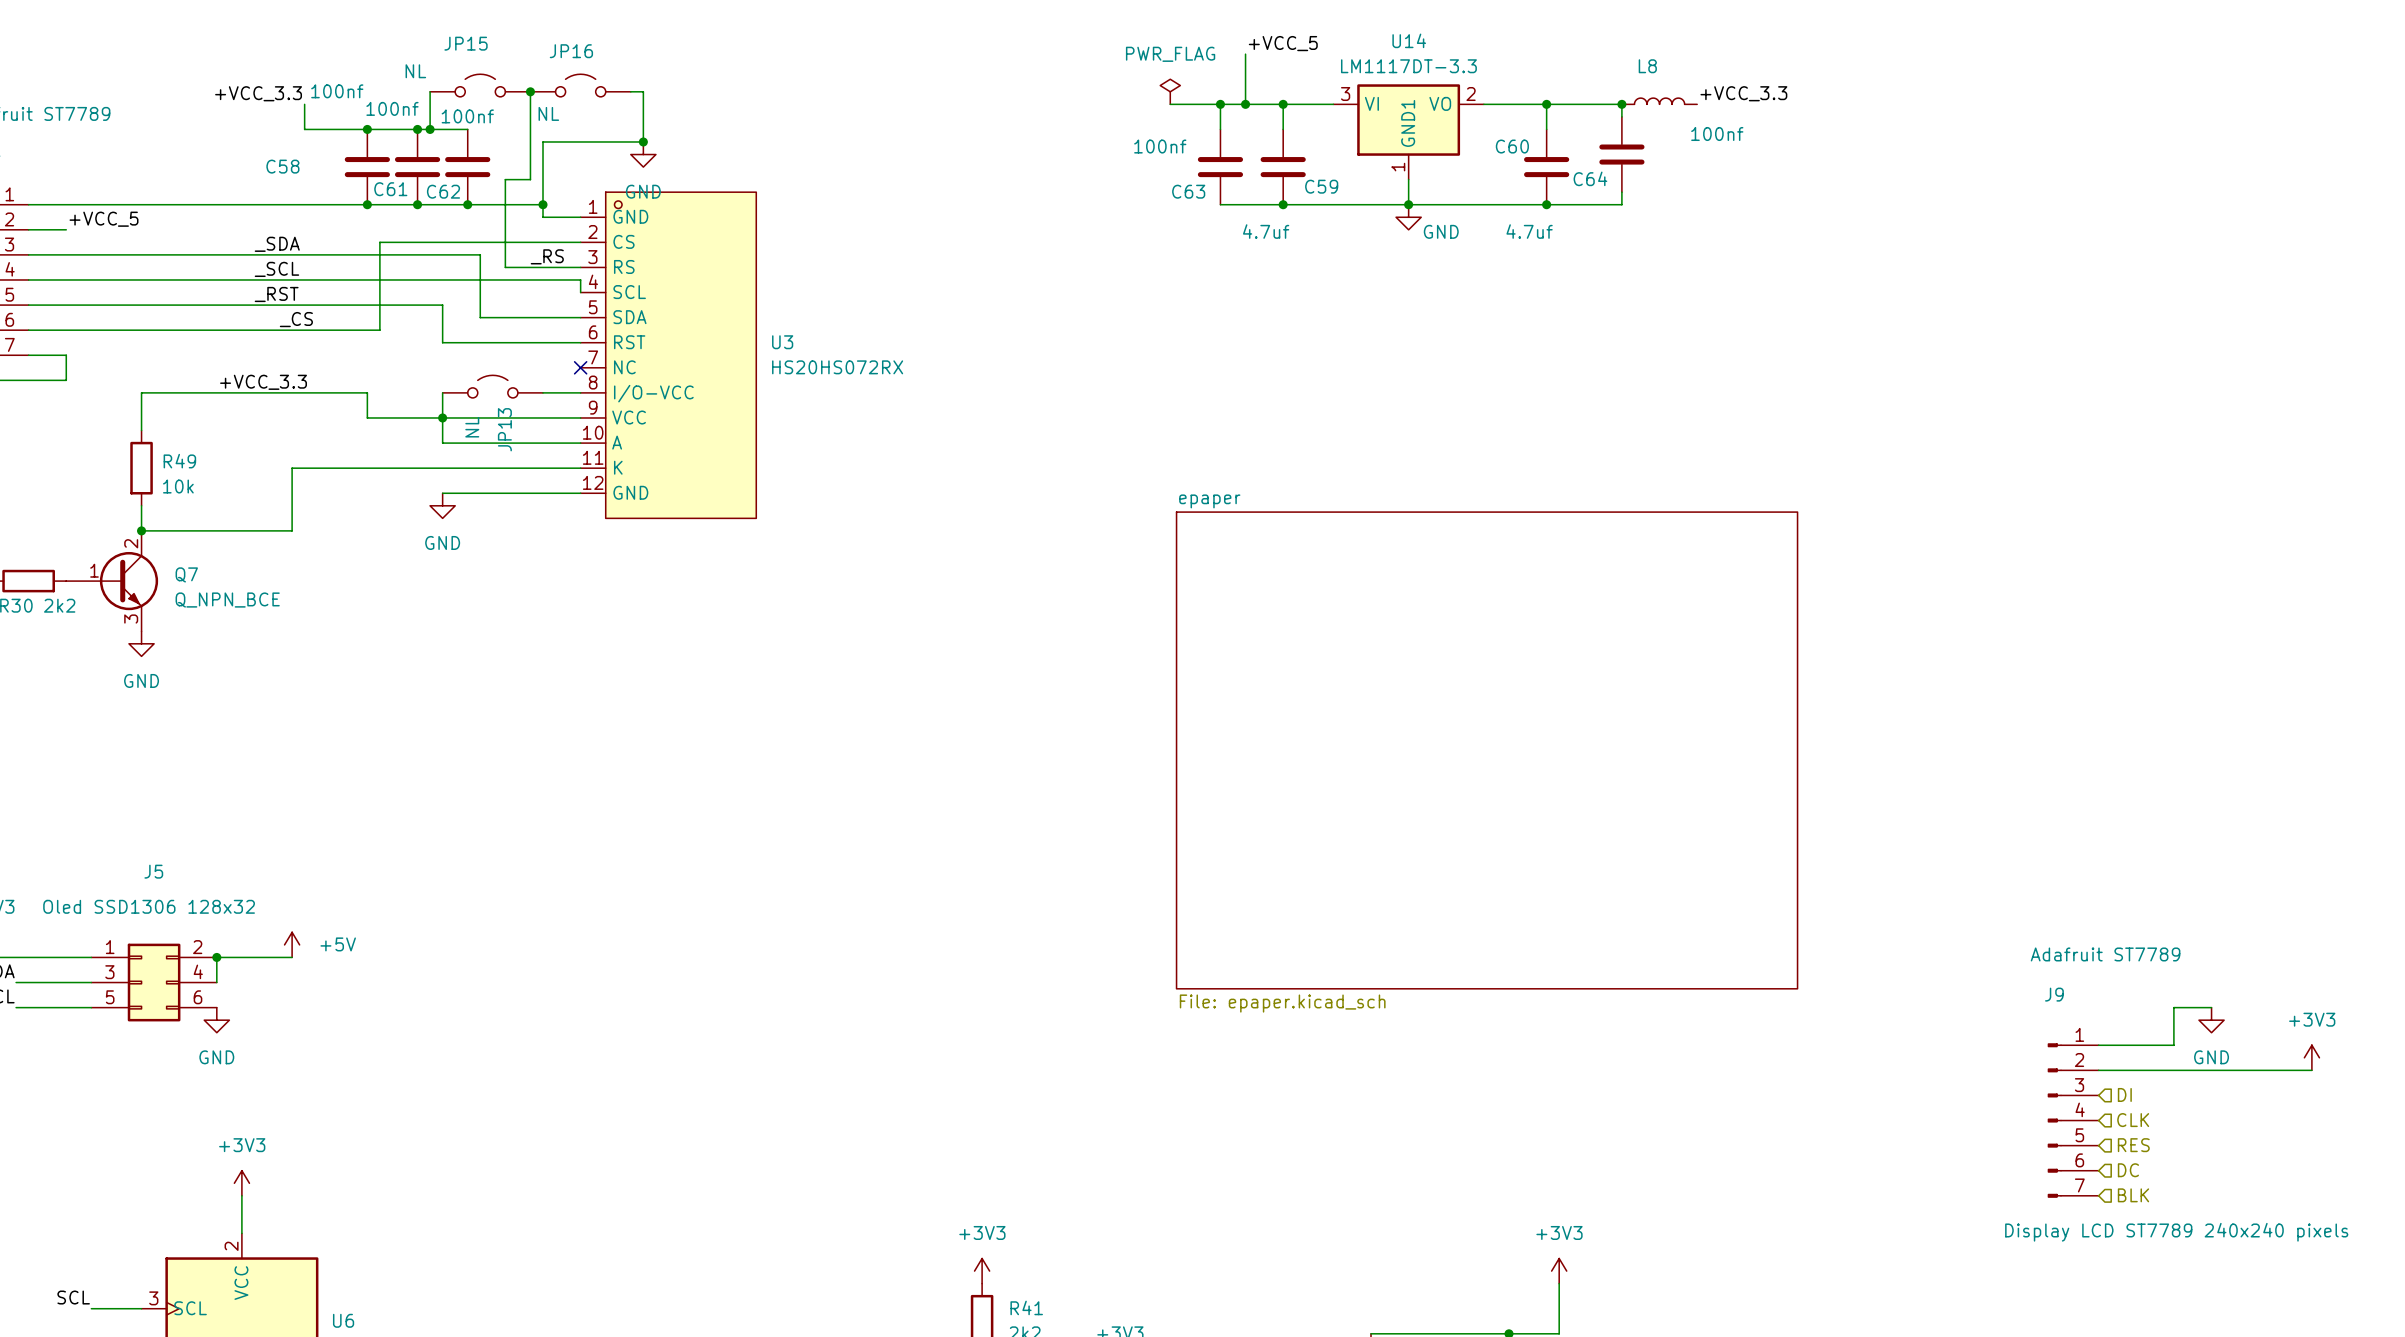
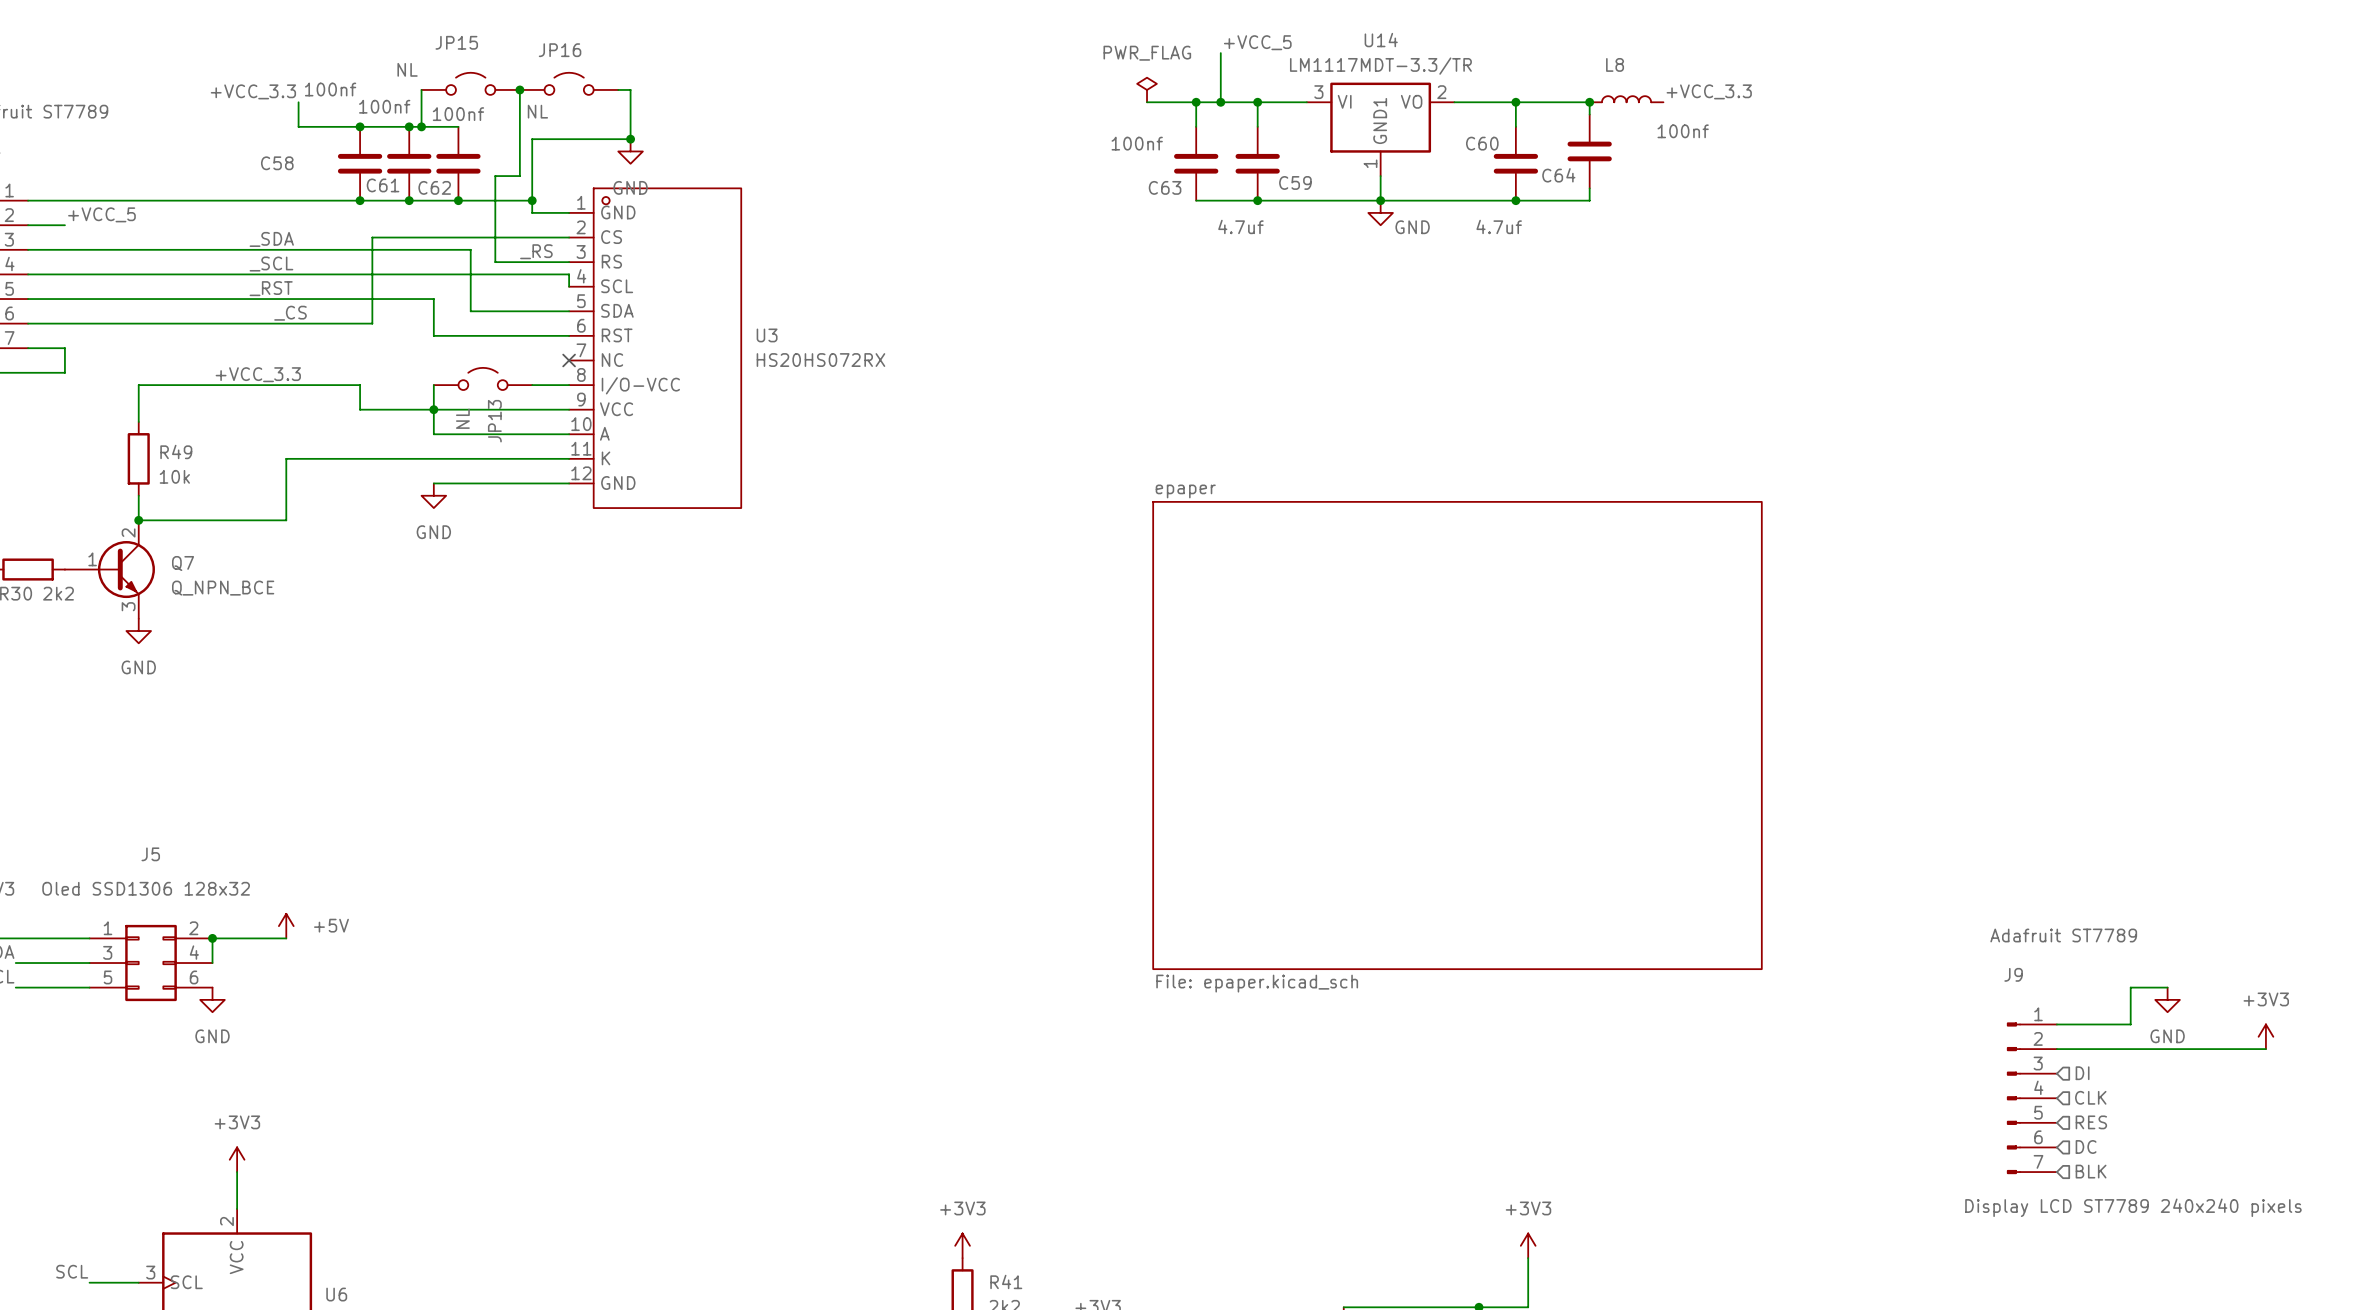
U14 value: LM1117DT-3.3 (1408, 66) -> LM1117MDT-3.3/TR (1380, 66)

